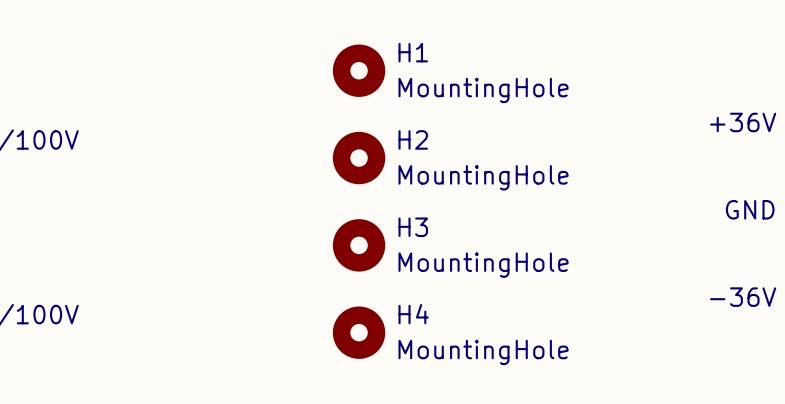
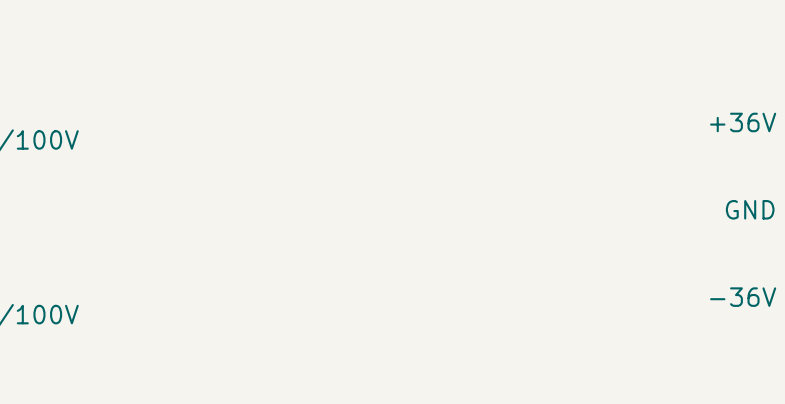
H1: MountingHole (359, 70) -> none
H2: MountingHole (359, 158) -> none
H3: MountingHole (359, 245) -> none
H4: MountingHole (359, 332) -> none

